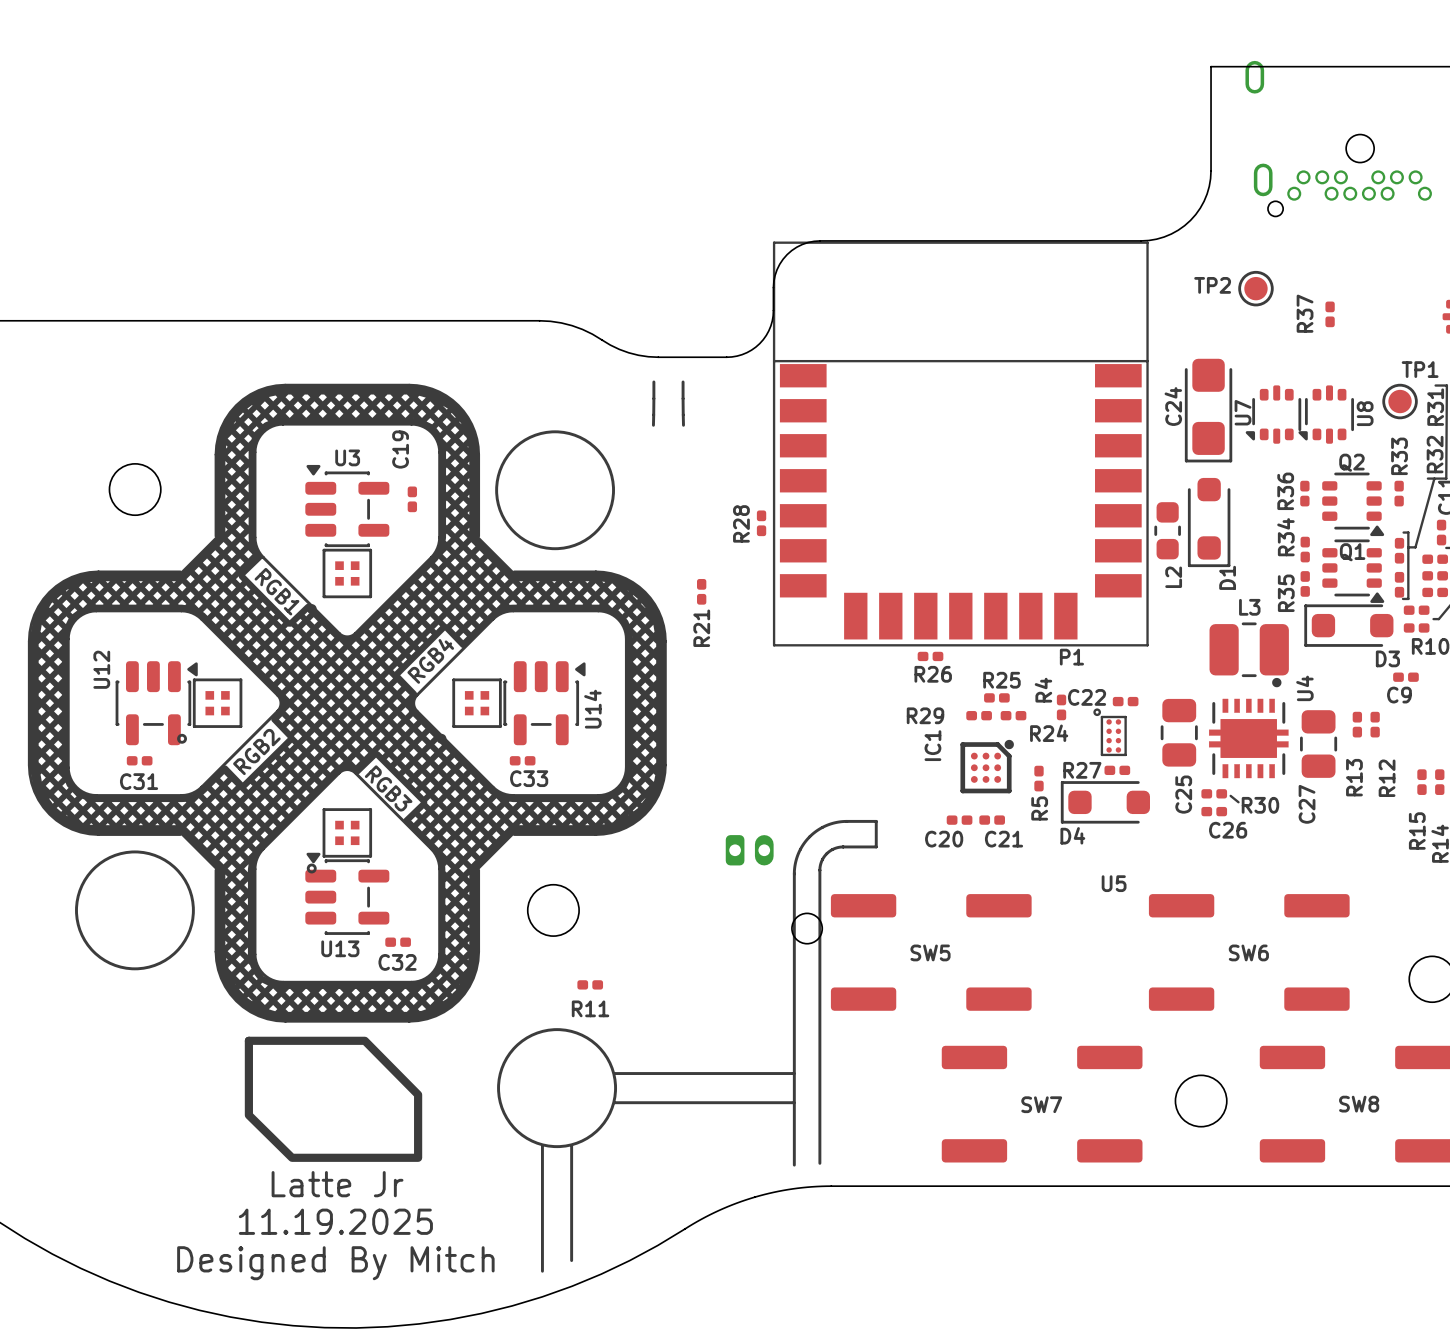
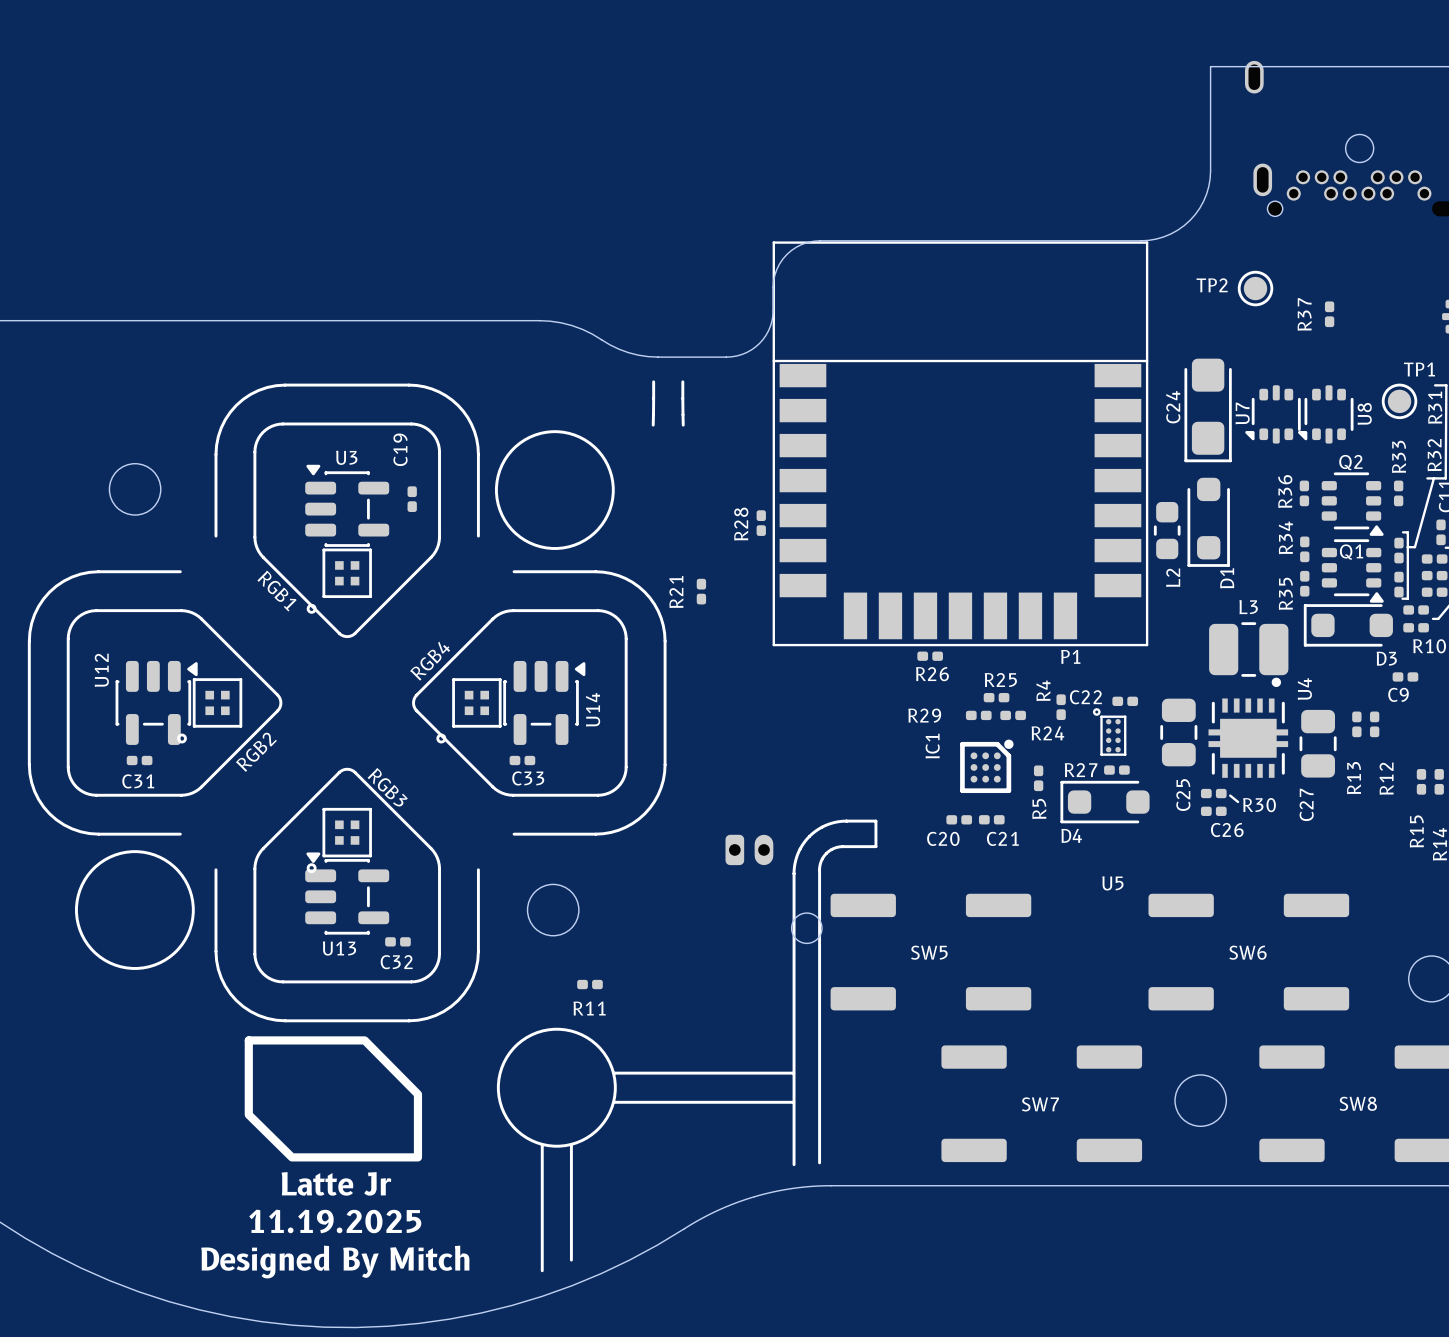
drawing: [29, 385, 666, 1022] -> none
R21 name position: R21 (701, 628) -> R21 (676, 592)

